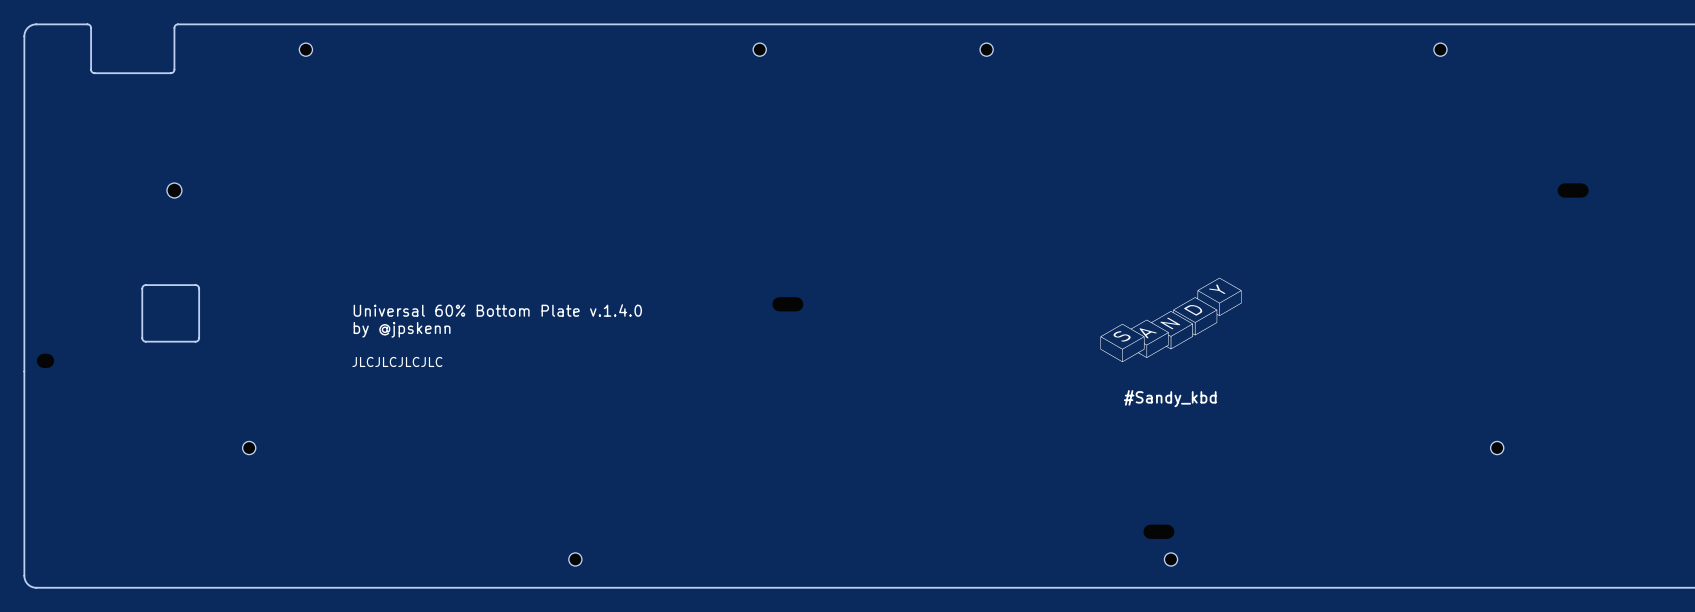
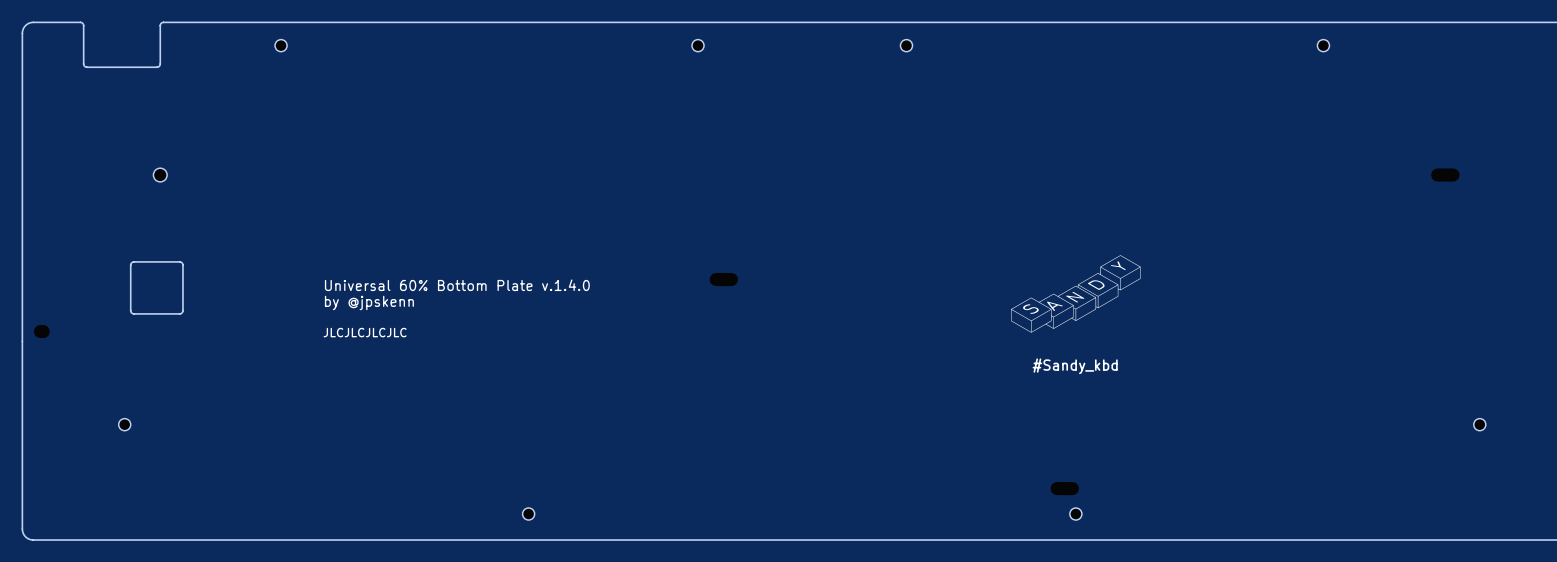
part position: (249, 448) -> (124, 424)
part position: (1497, 448) -> (1479, 424)

